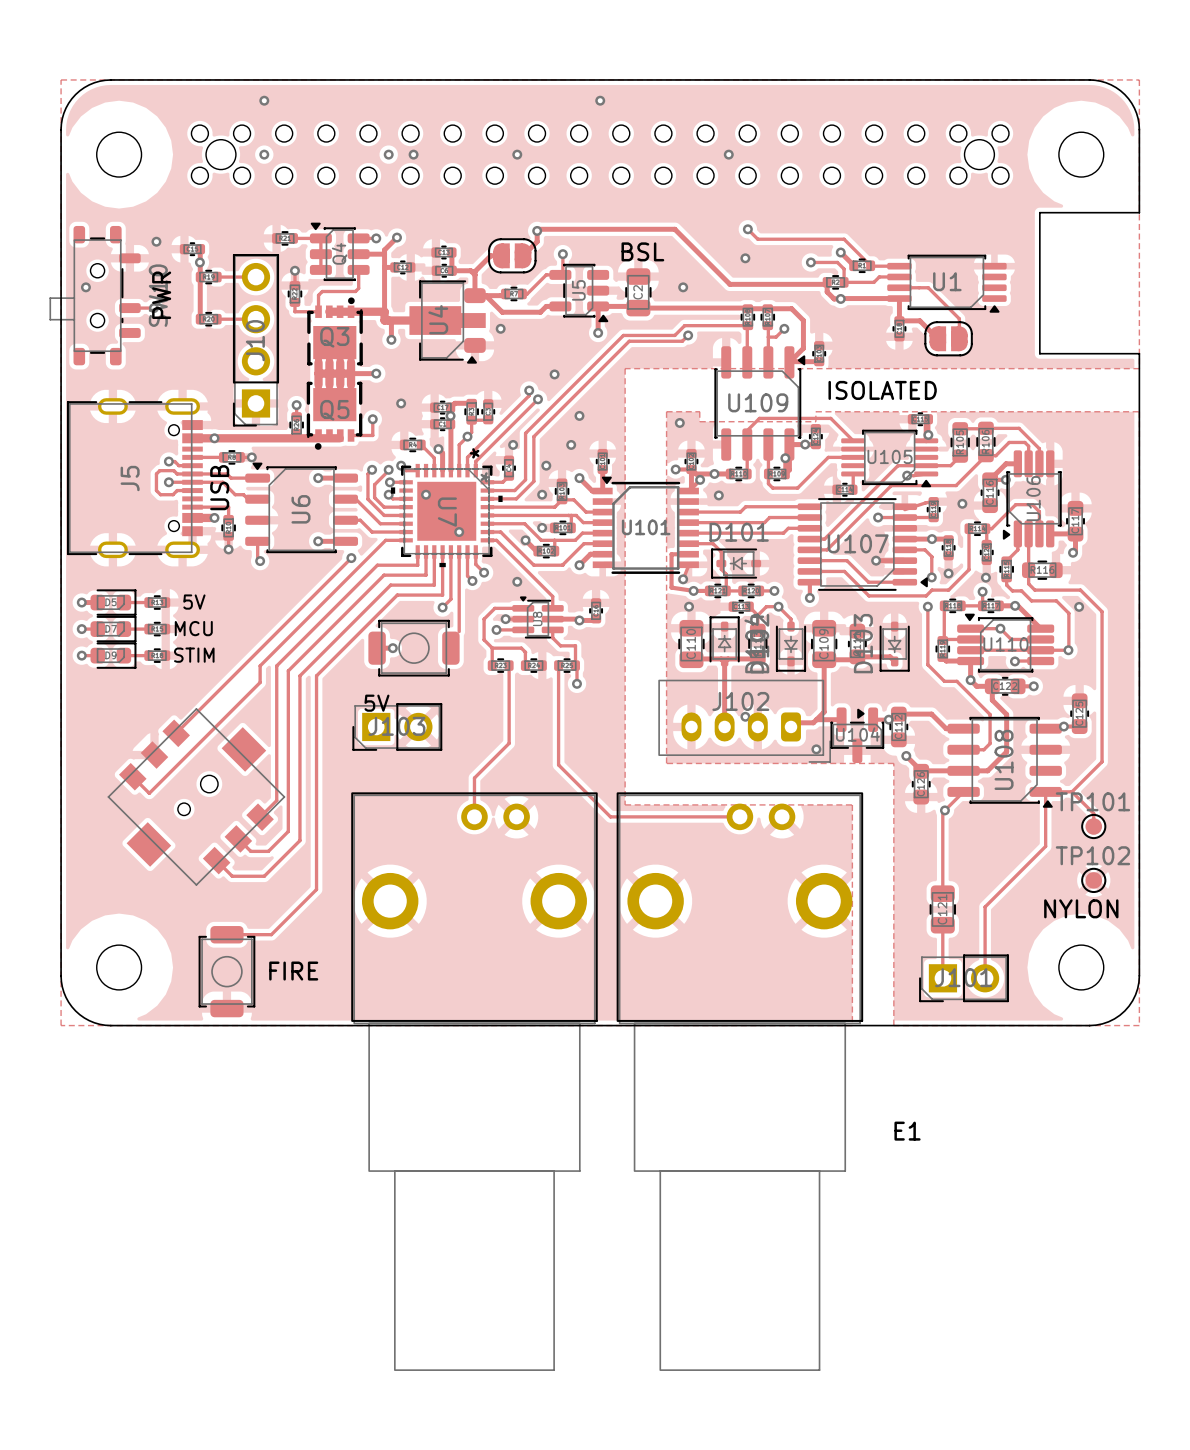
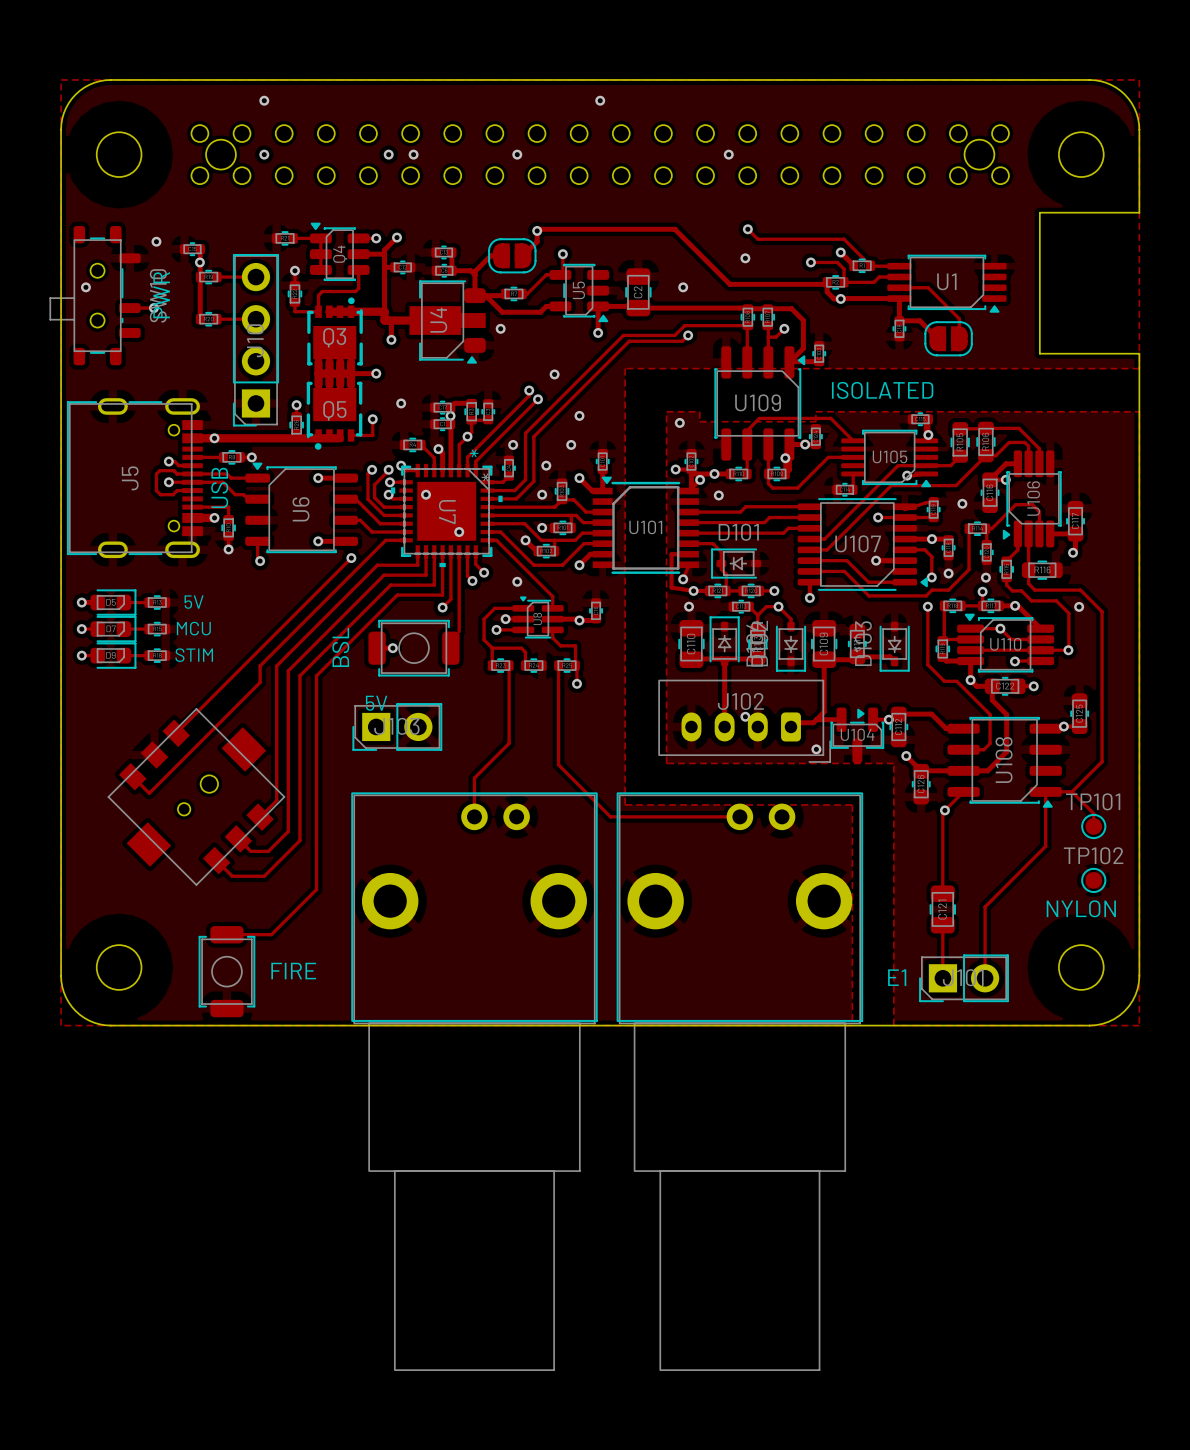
text: BSL (642, 251) -> none
text: none -> BSL (340, 647)
text position: E1 (907, 1131) -> E1 (897, 977)

